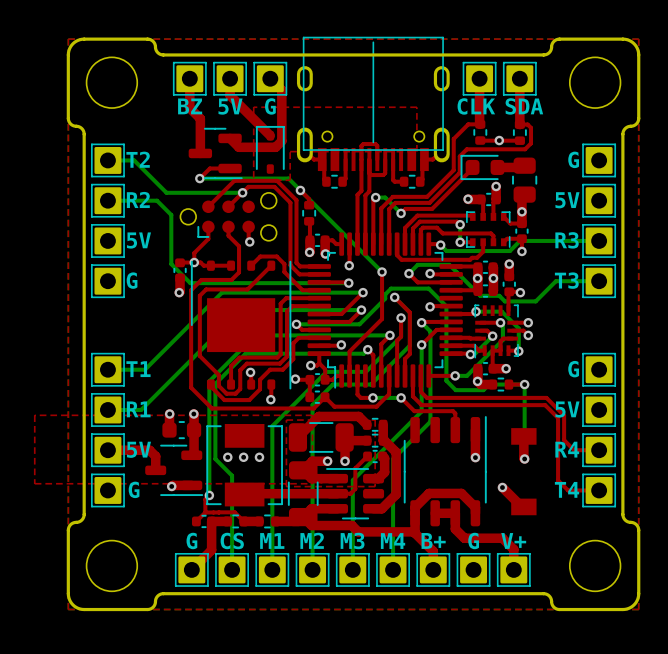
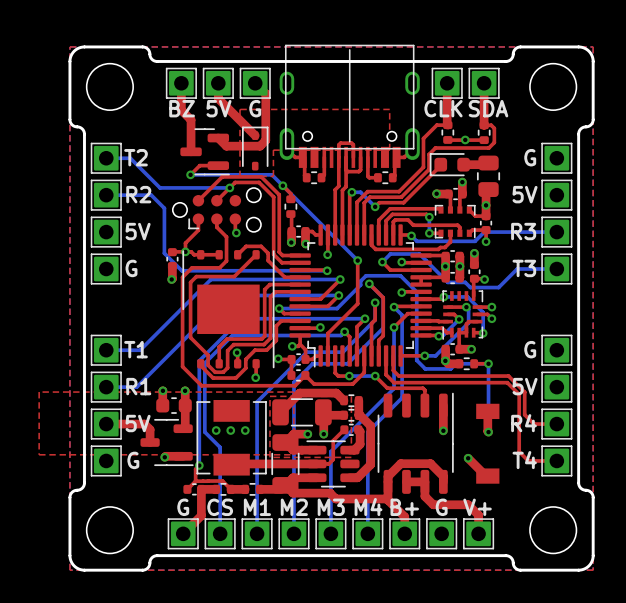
top track: none -> (421, 277) (421, 284)

